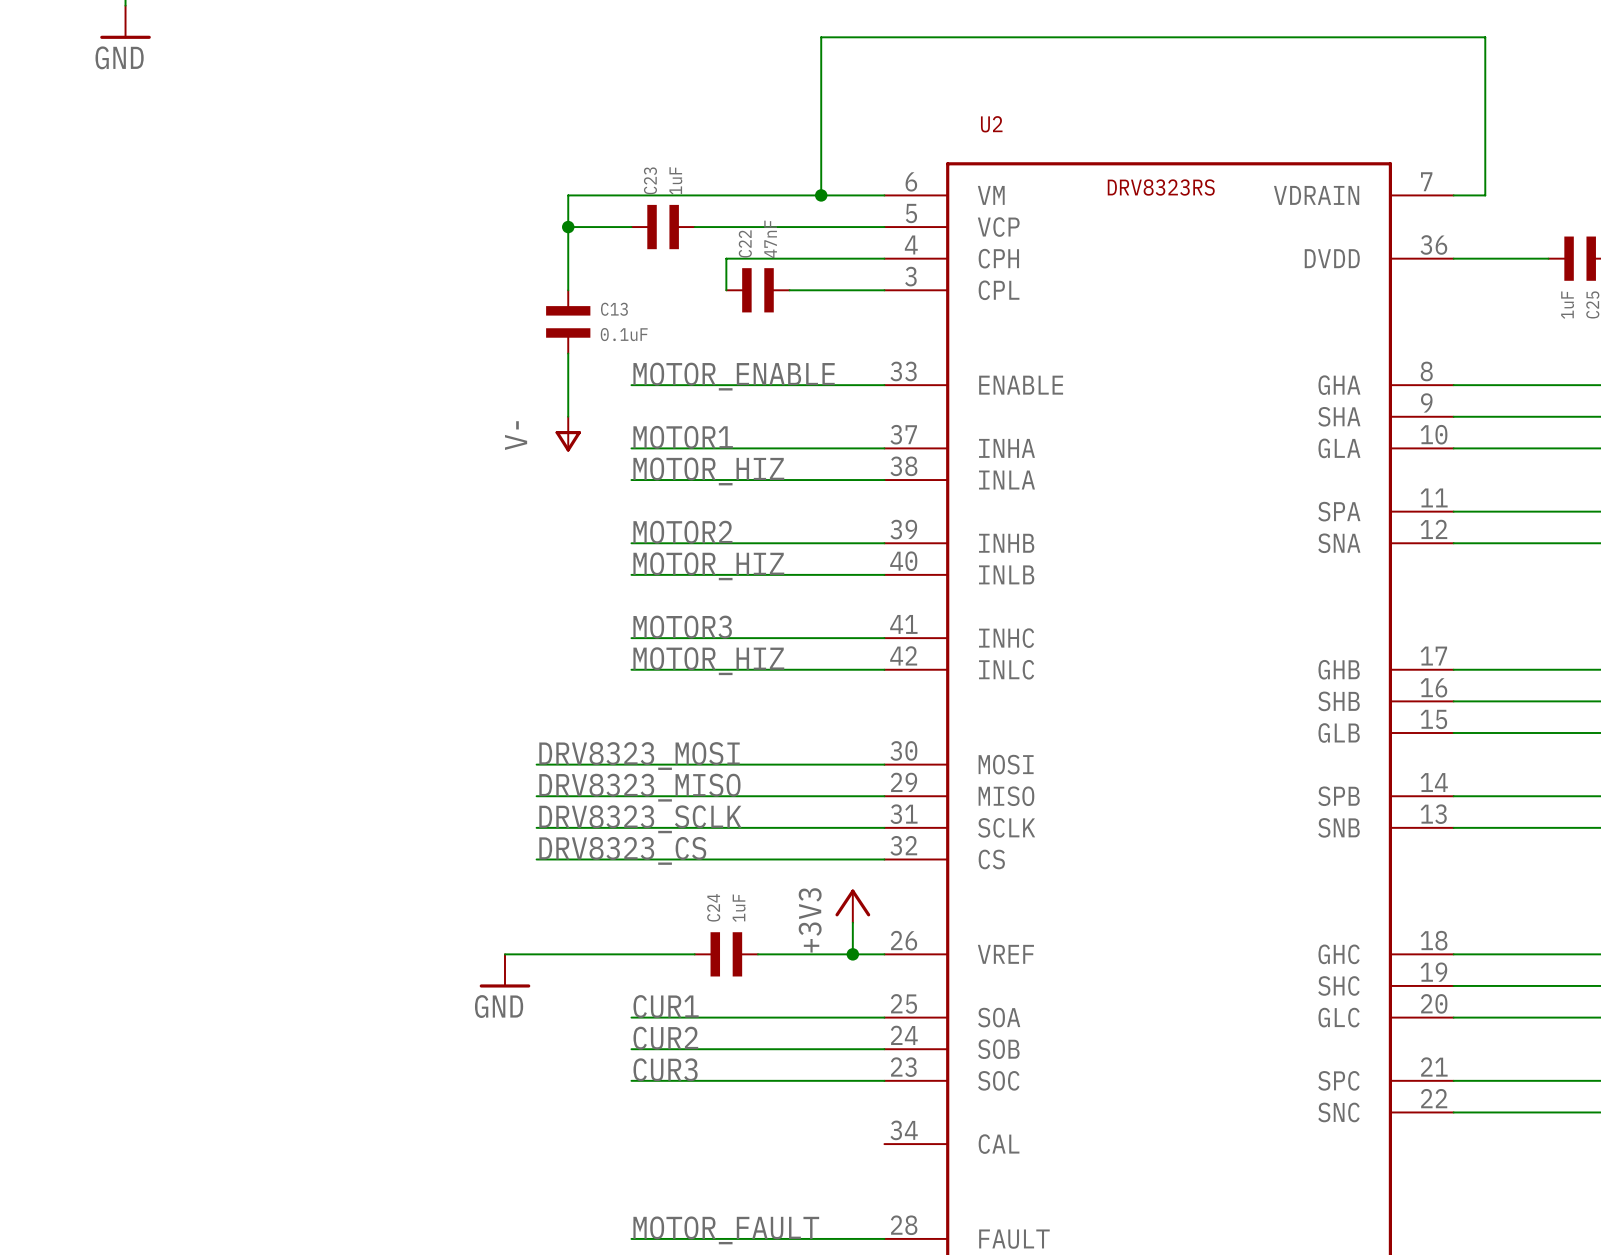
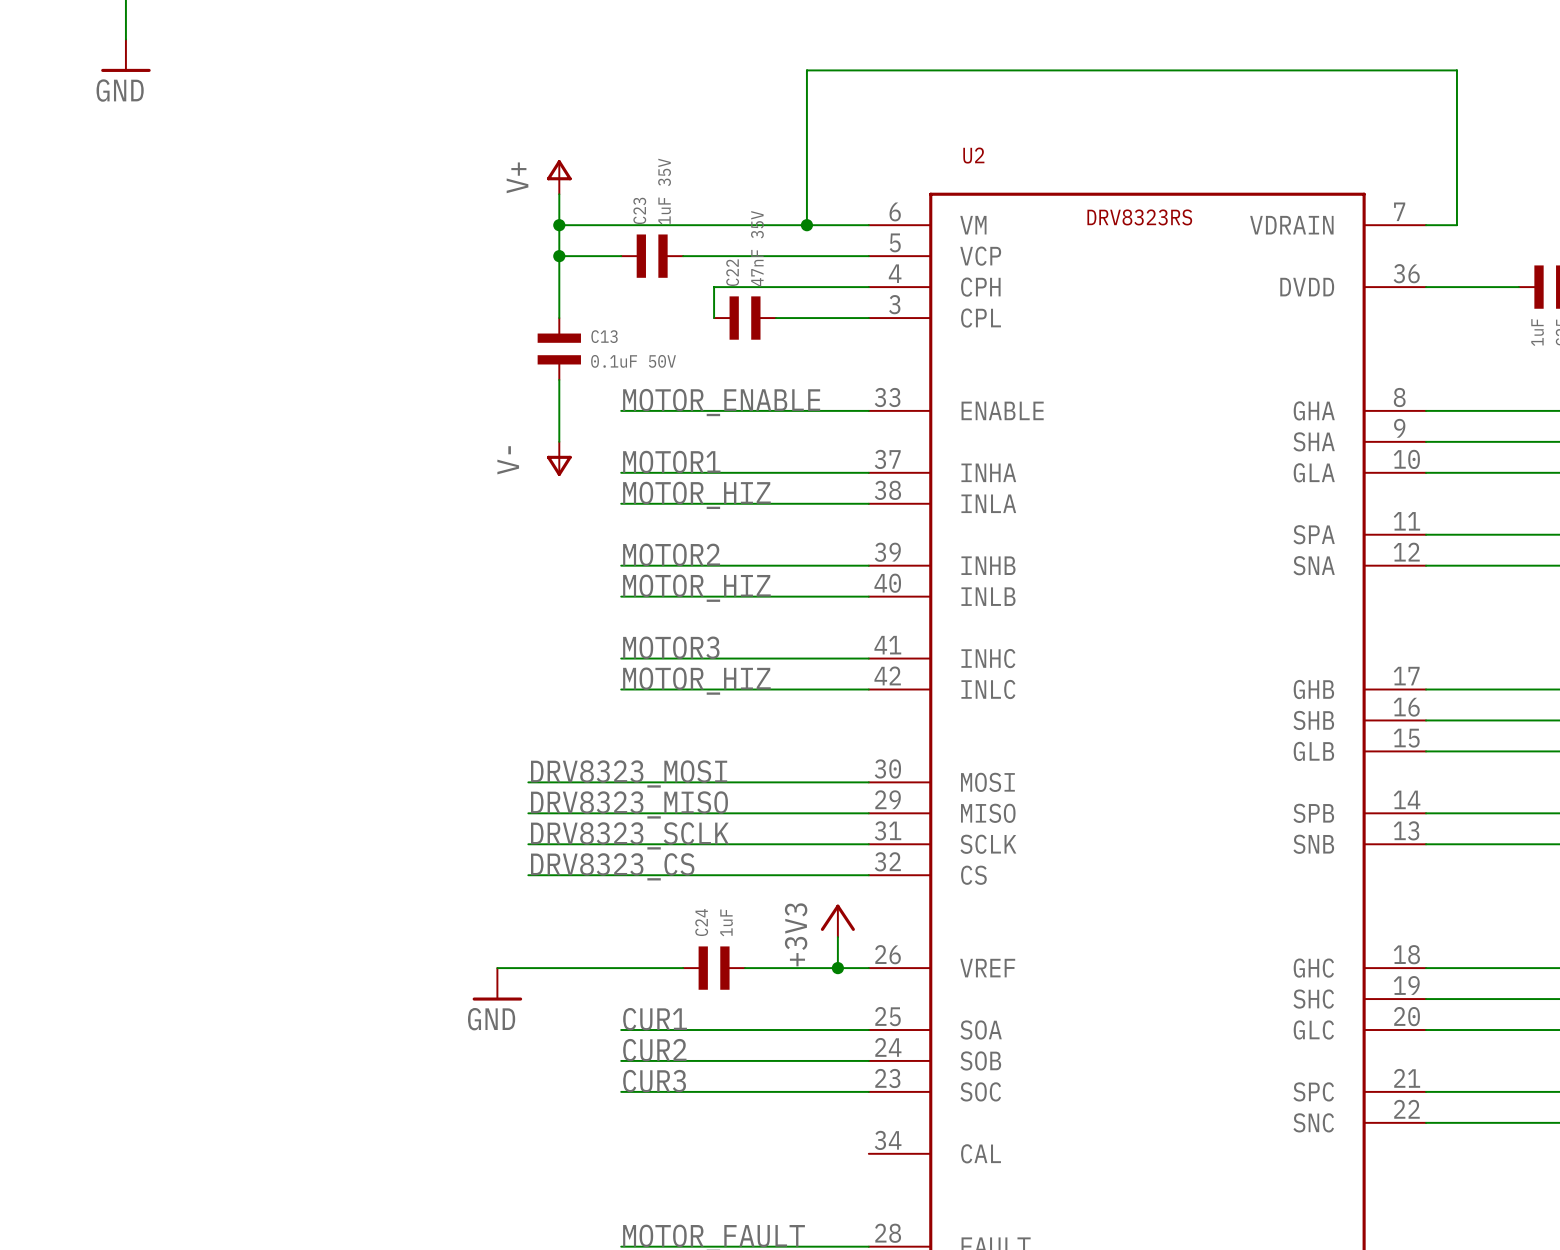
power symbol: none -> V+ (559, 177)
wire: none -> (559, 194) (559, 225)
C23 value: 1uF (675, 180) -> 1uF 35V (664, 191)
junction: none -> (559, 225)
C22 value: 47nF (770, 239) -> 47nF 35V (757, 248)
C13 value: 0.1uF (624, 334) -> 0.1uF 50V (633, 361)

